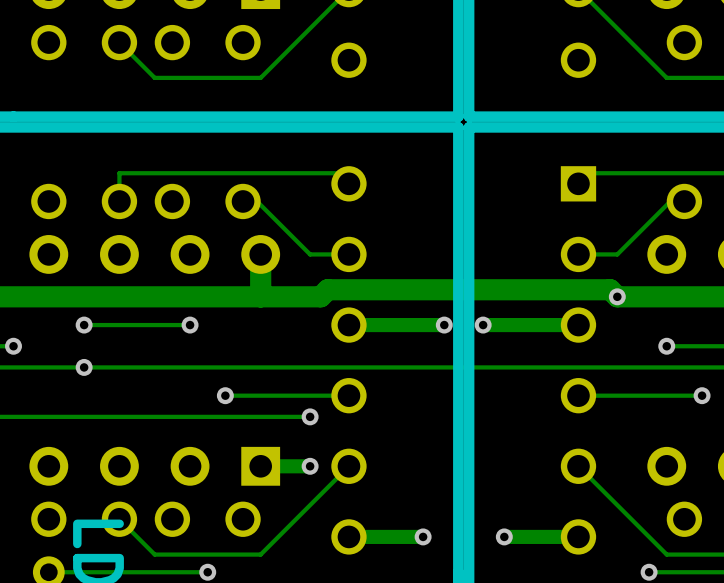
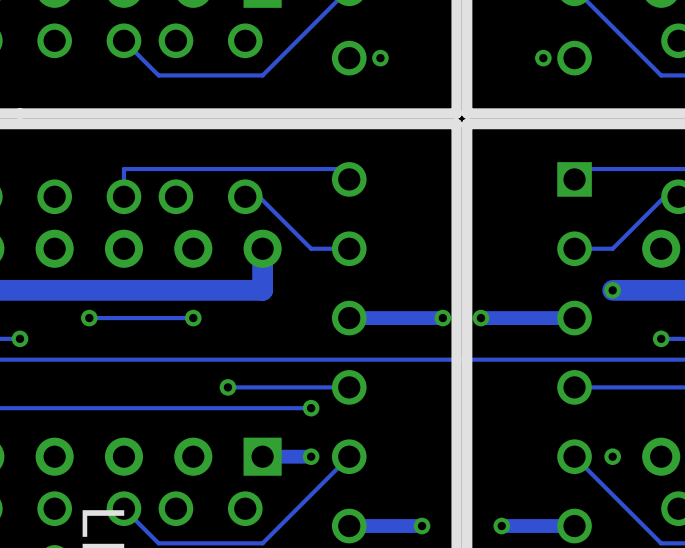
via: none -> (380, 58)
via: none -> (543, 58)
track: (617, 296) (610, 289) (327, 289) (320, 296) (260, 296) -> none
via: (84, 367) -> none
via: none -> (612, 456)

